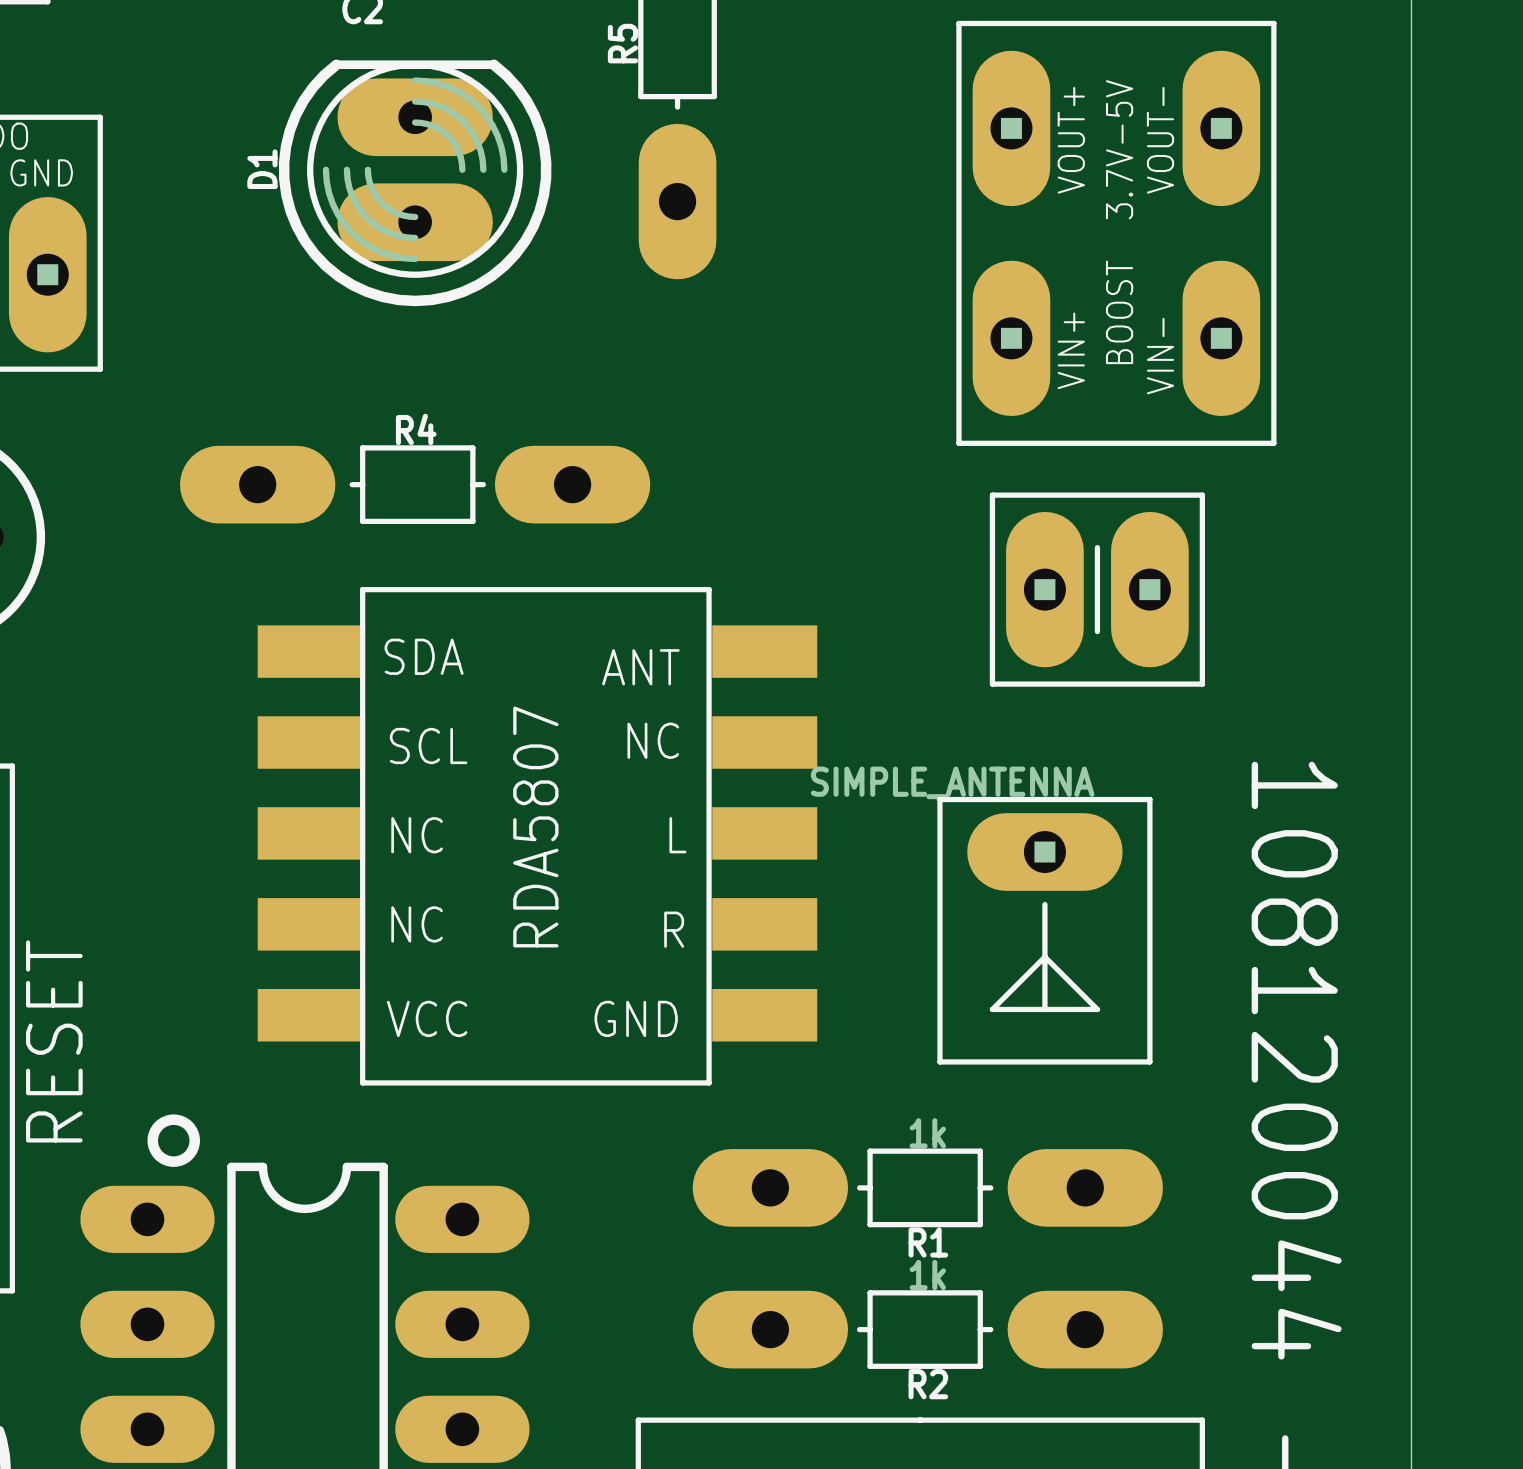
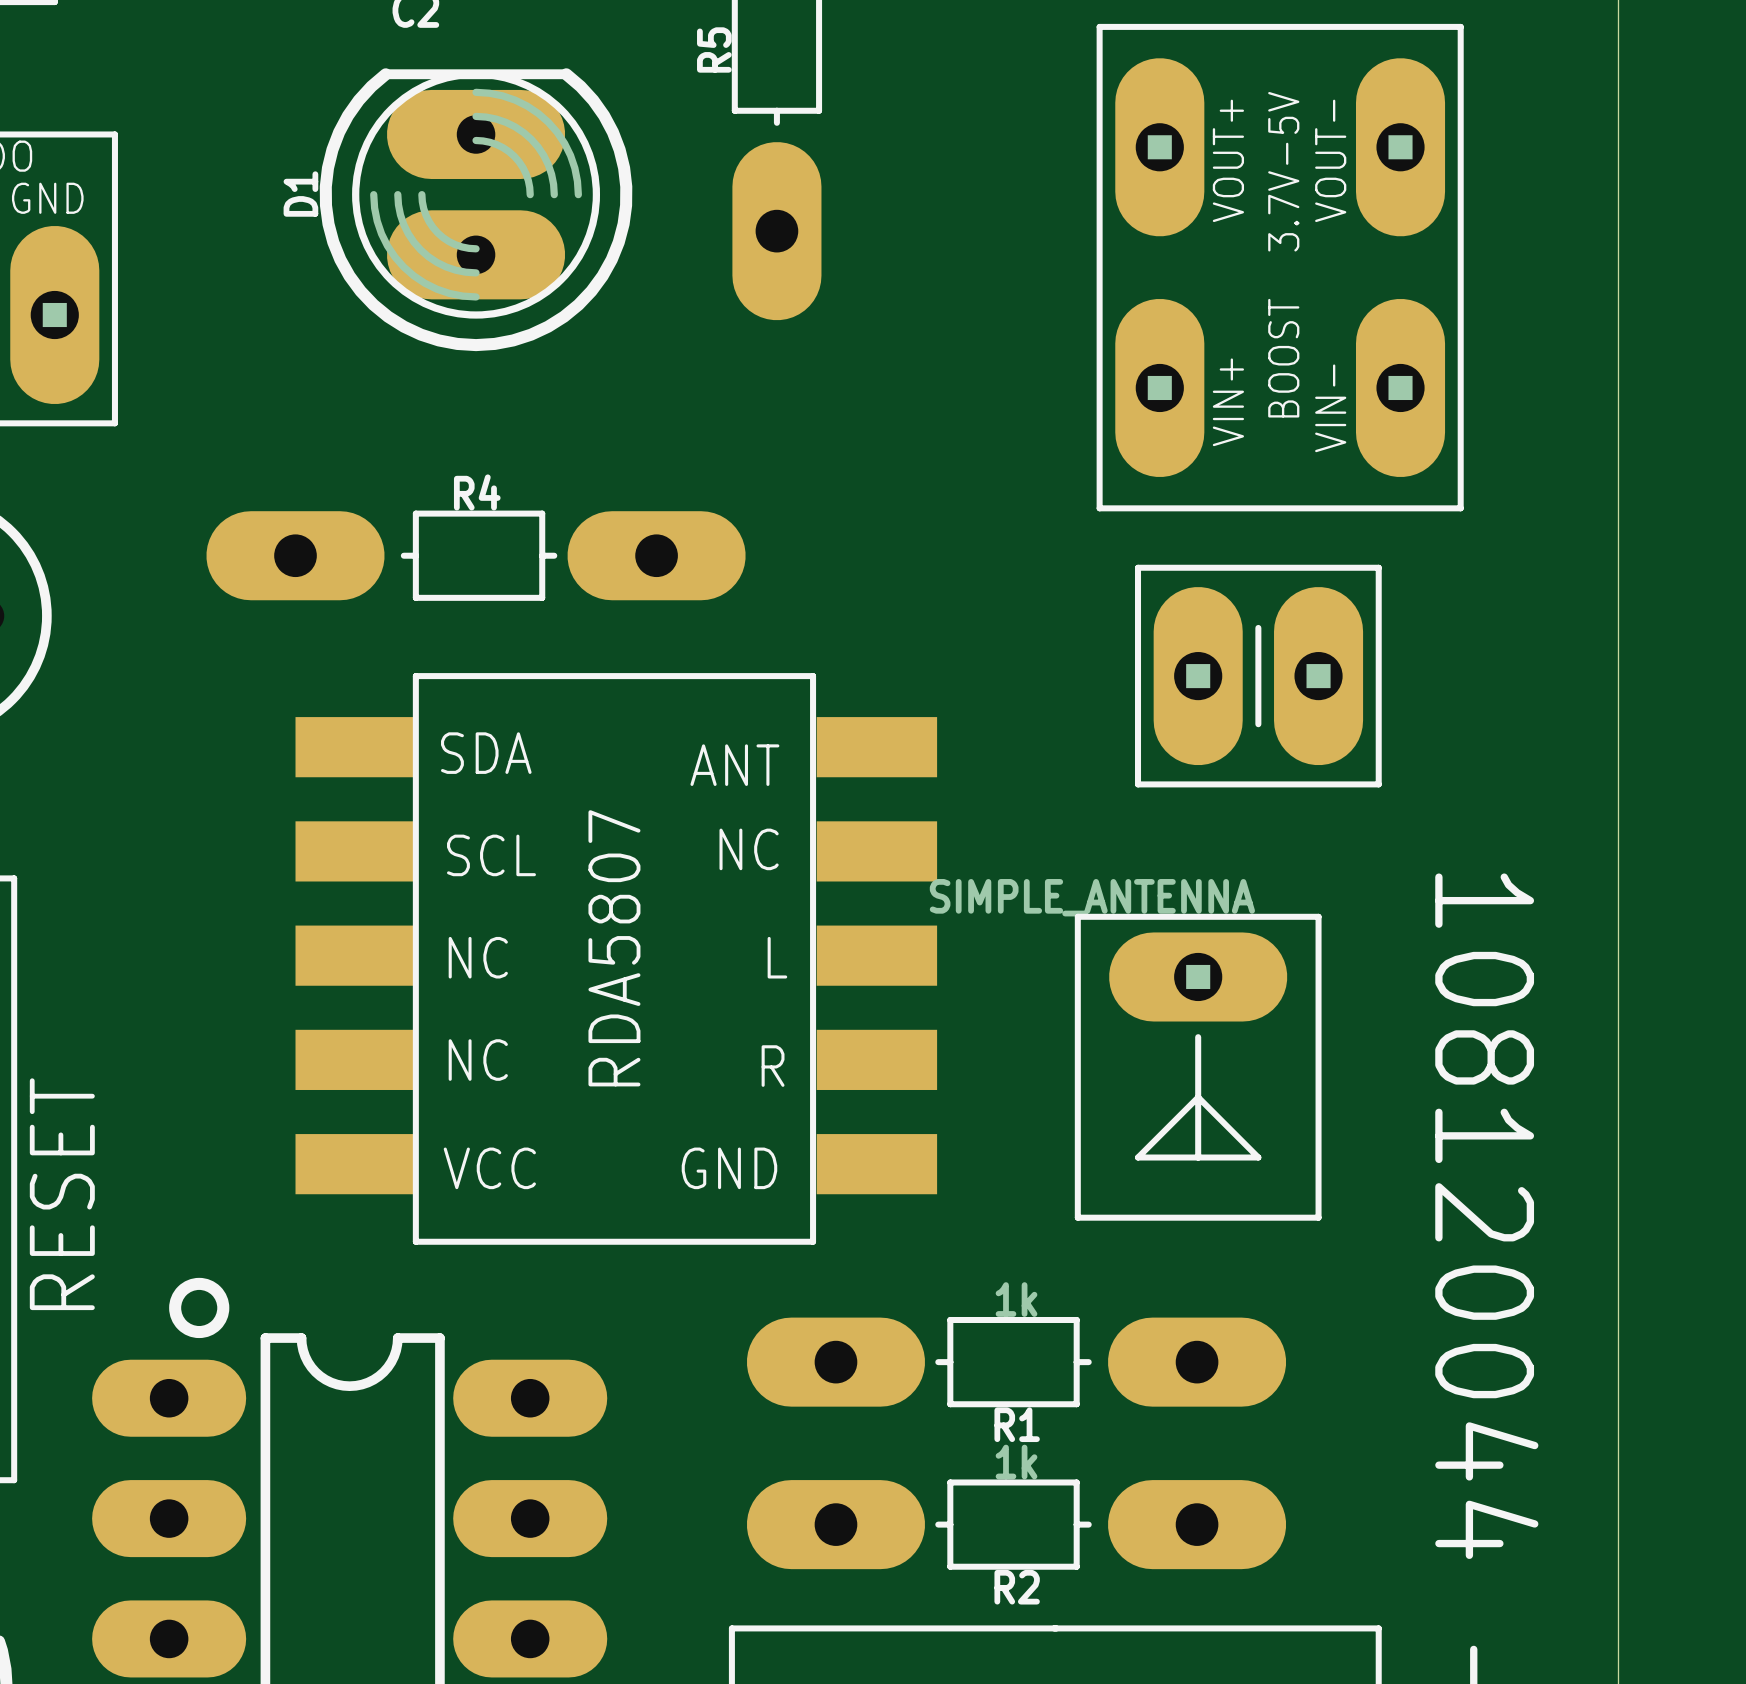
R1 position: (927, 1187) -> (1016, 1362)
R2 position: (927, 1329) -> (1016, 1524)

